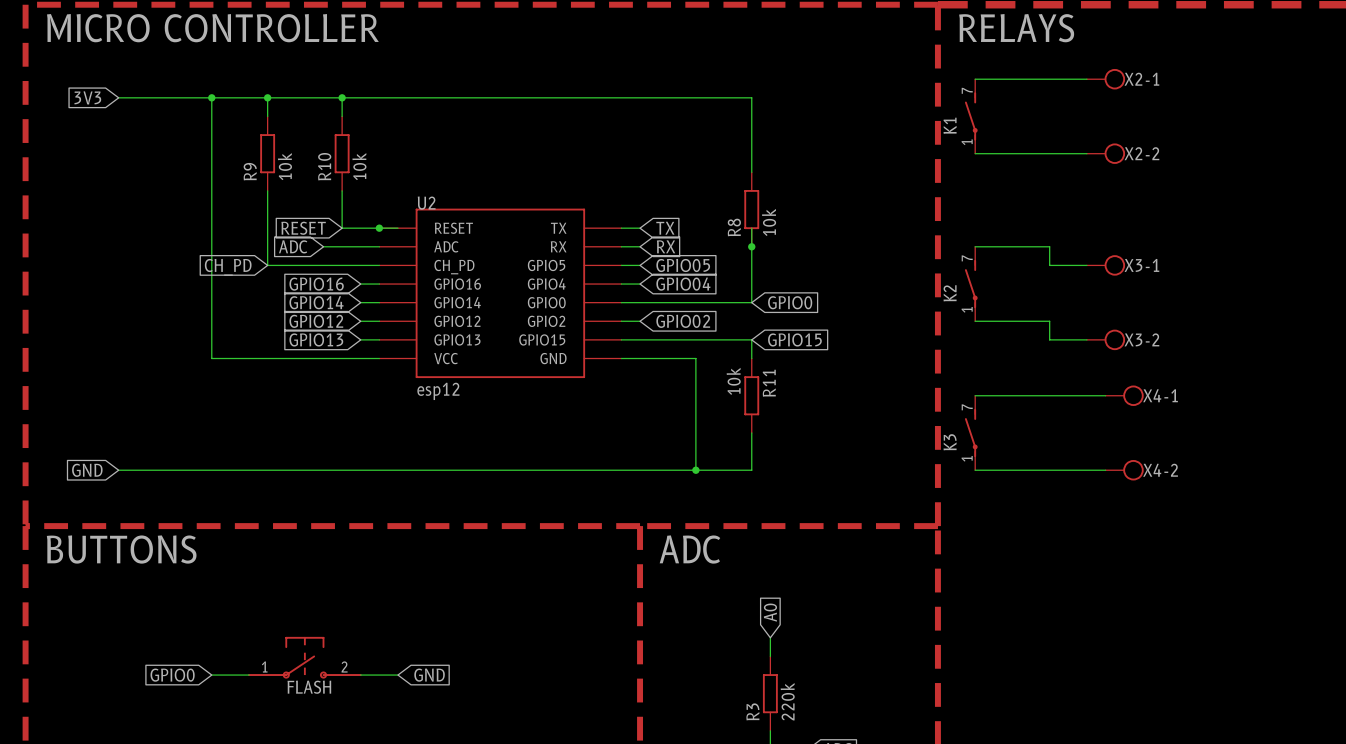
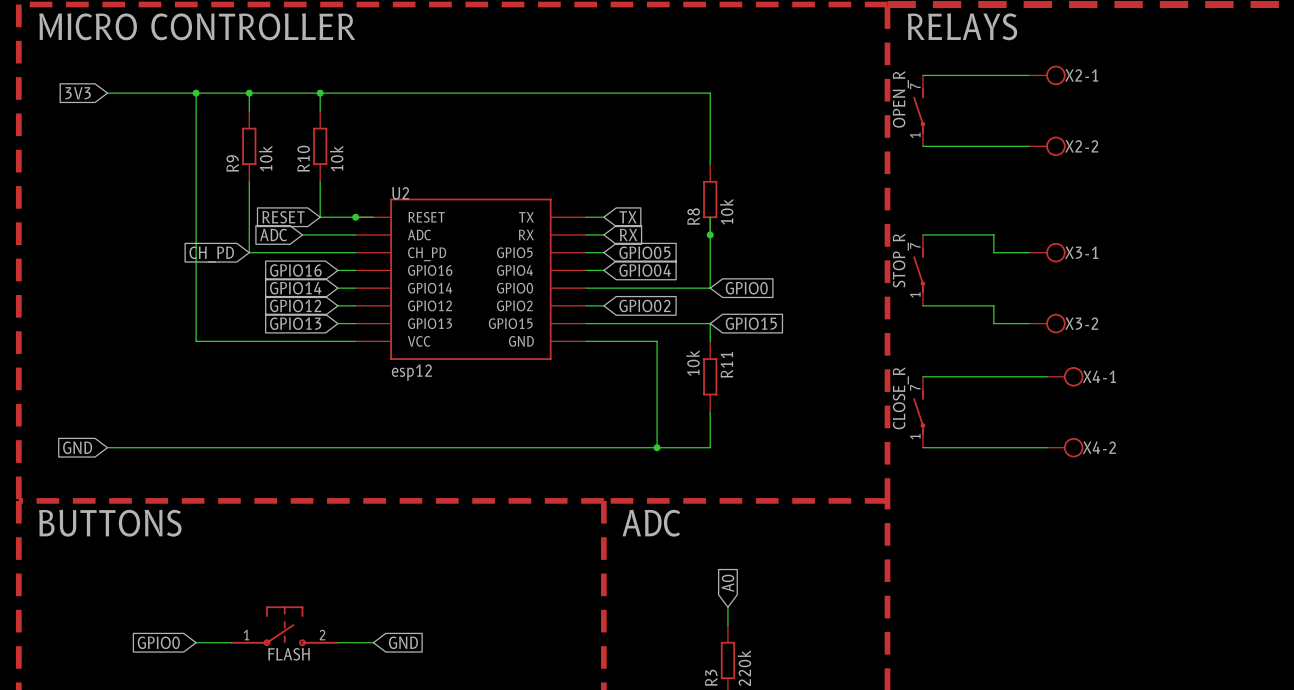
K1 name: K1 (950, 125) -> OPEN_R (900, 99)
K2 name: K2 (950, 293) -> STOP_R (900, 260)
K3 name: K3 (950, 442) -> CLOSE_R (900, 398)

